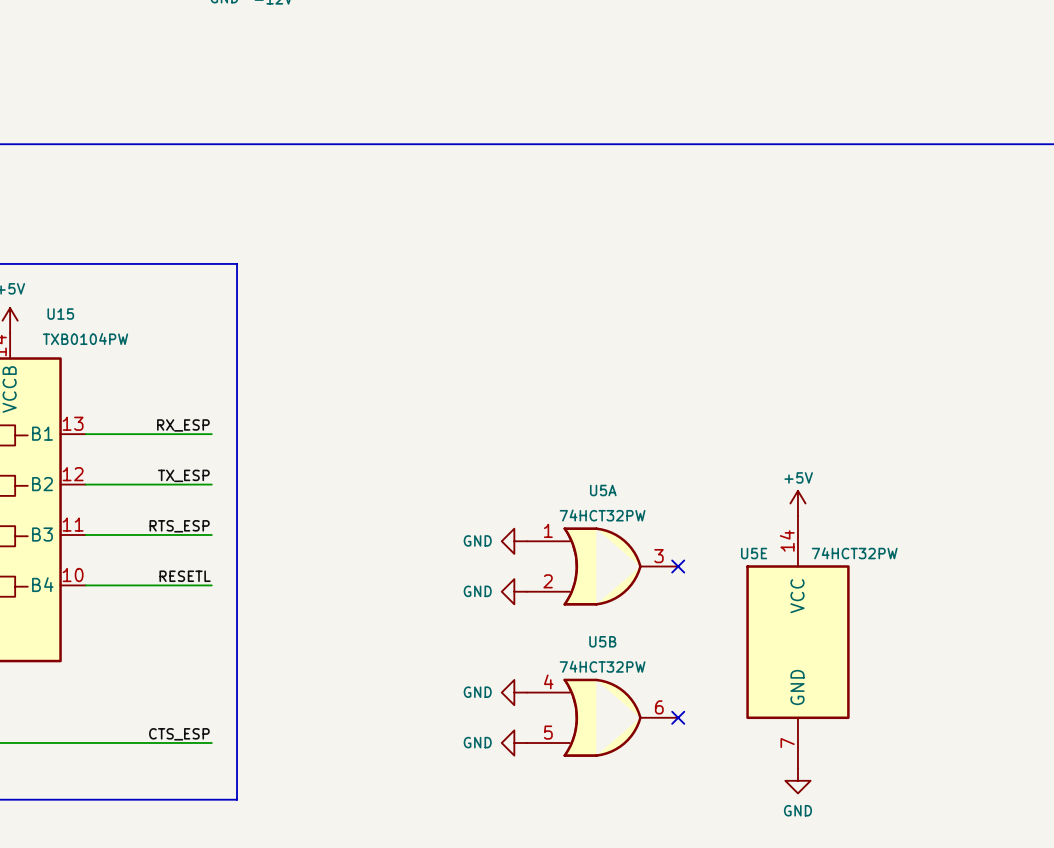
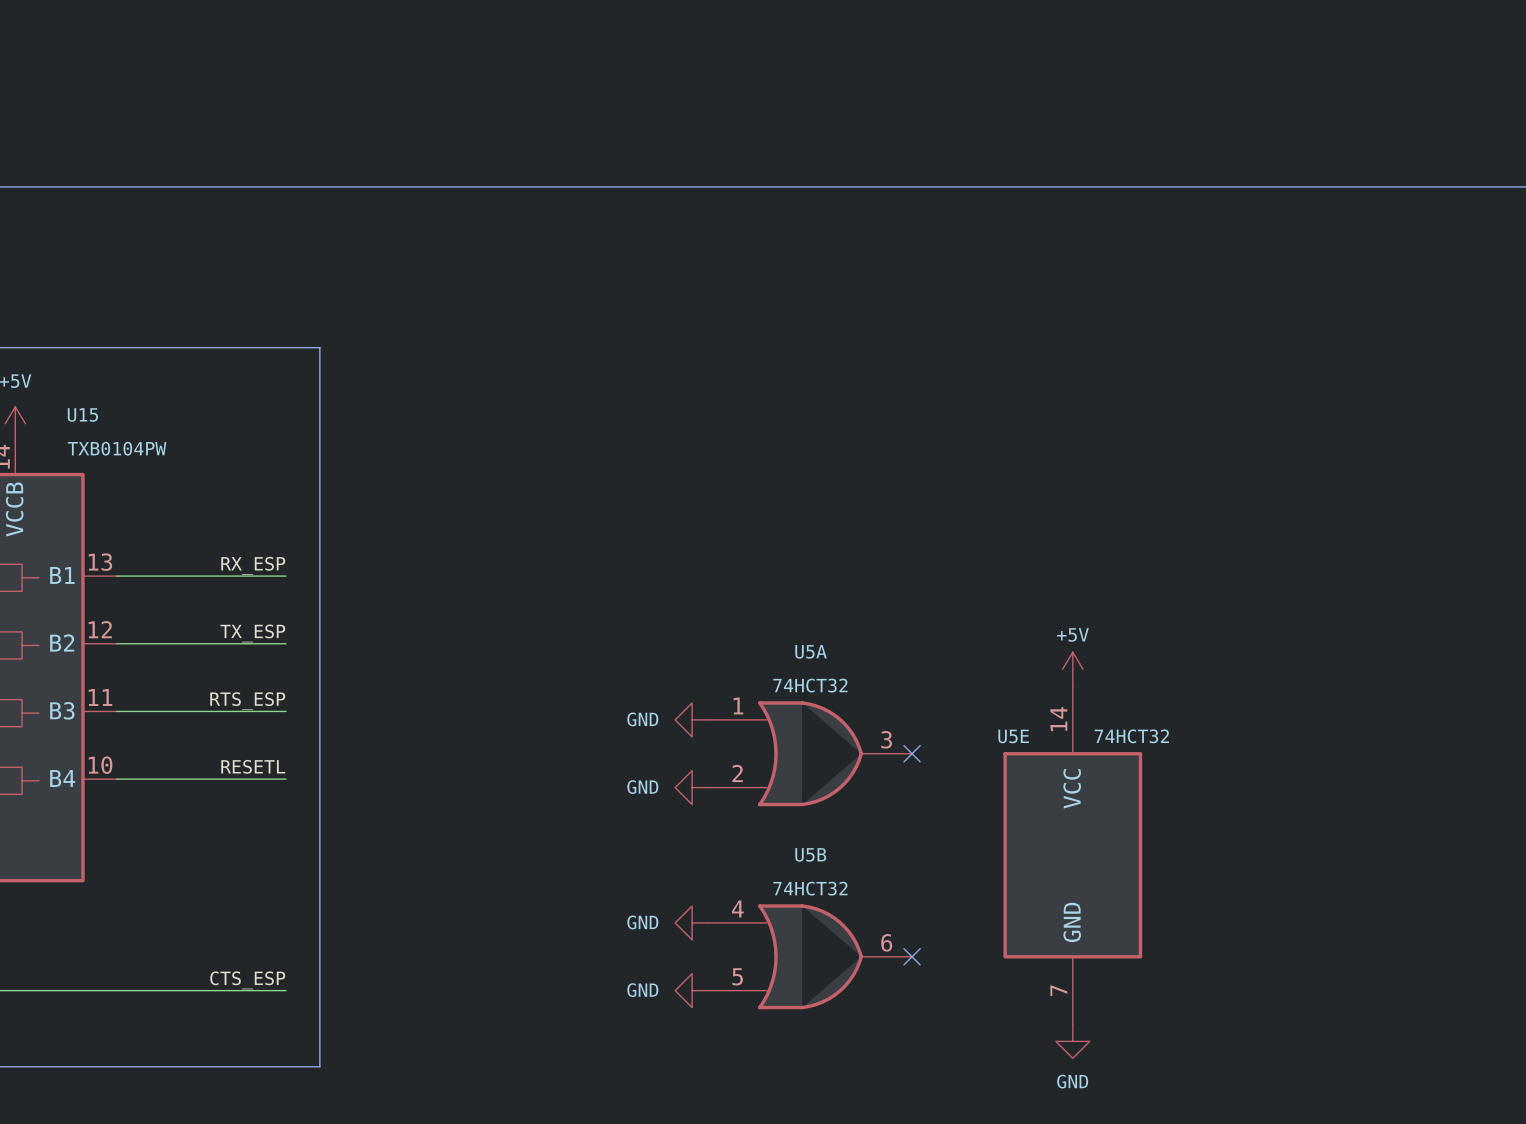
U5A value: 74HCT32PW (602, 515) -> 74HCT32 (810, 685)
U5E value: 74HCT32PW (854, 553) -> 74HCT32 (1131, 736)
U5B value: 74HCT32PW (602, 666) -> 74HCT32 (810, 888)

